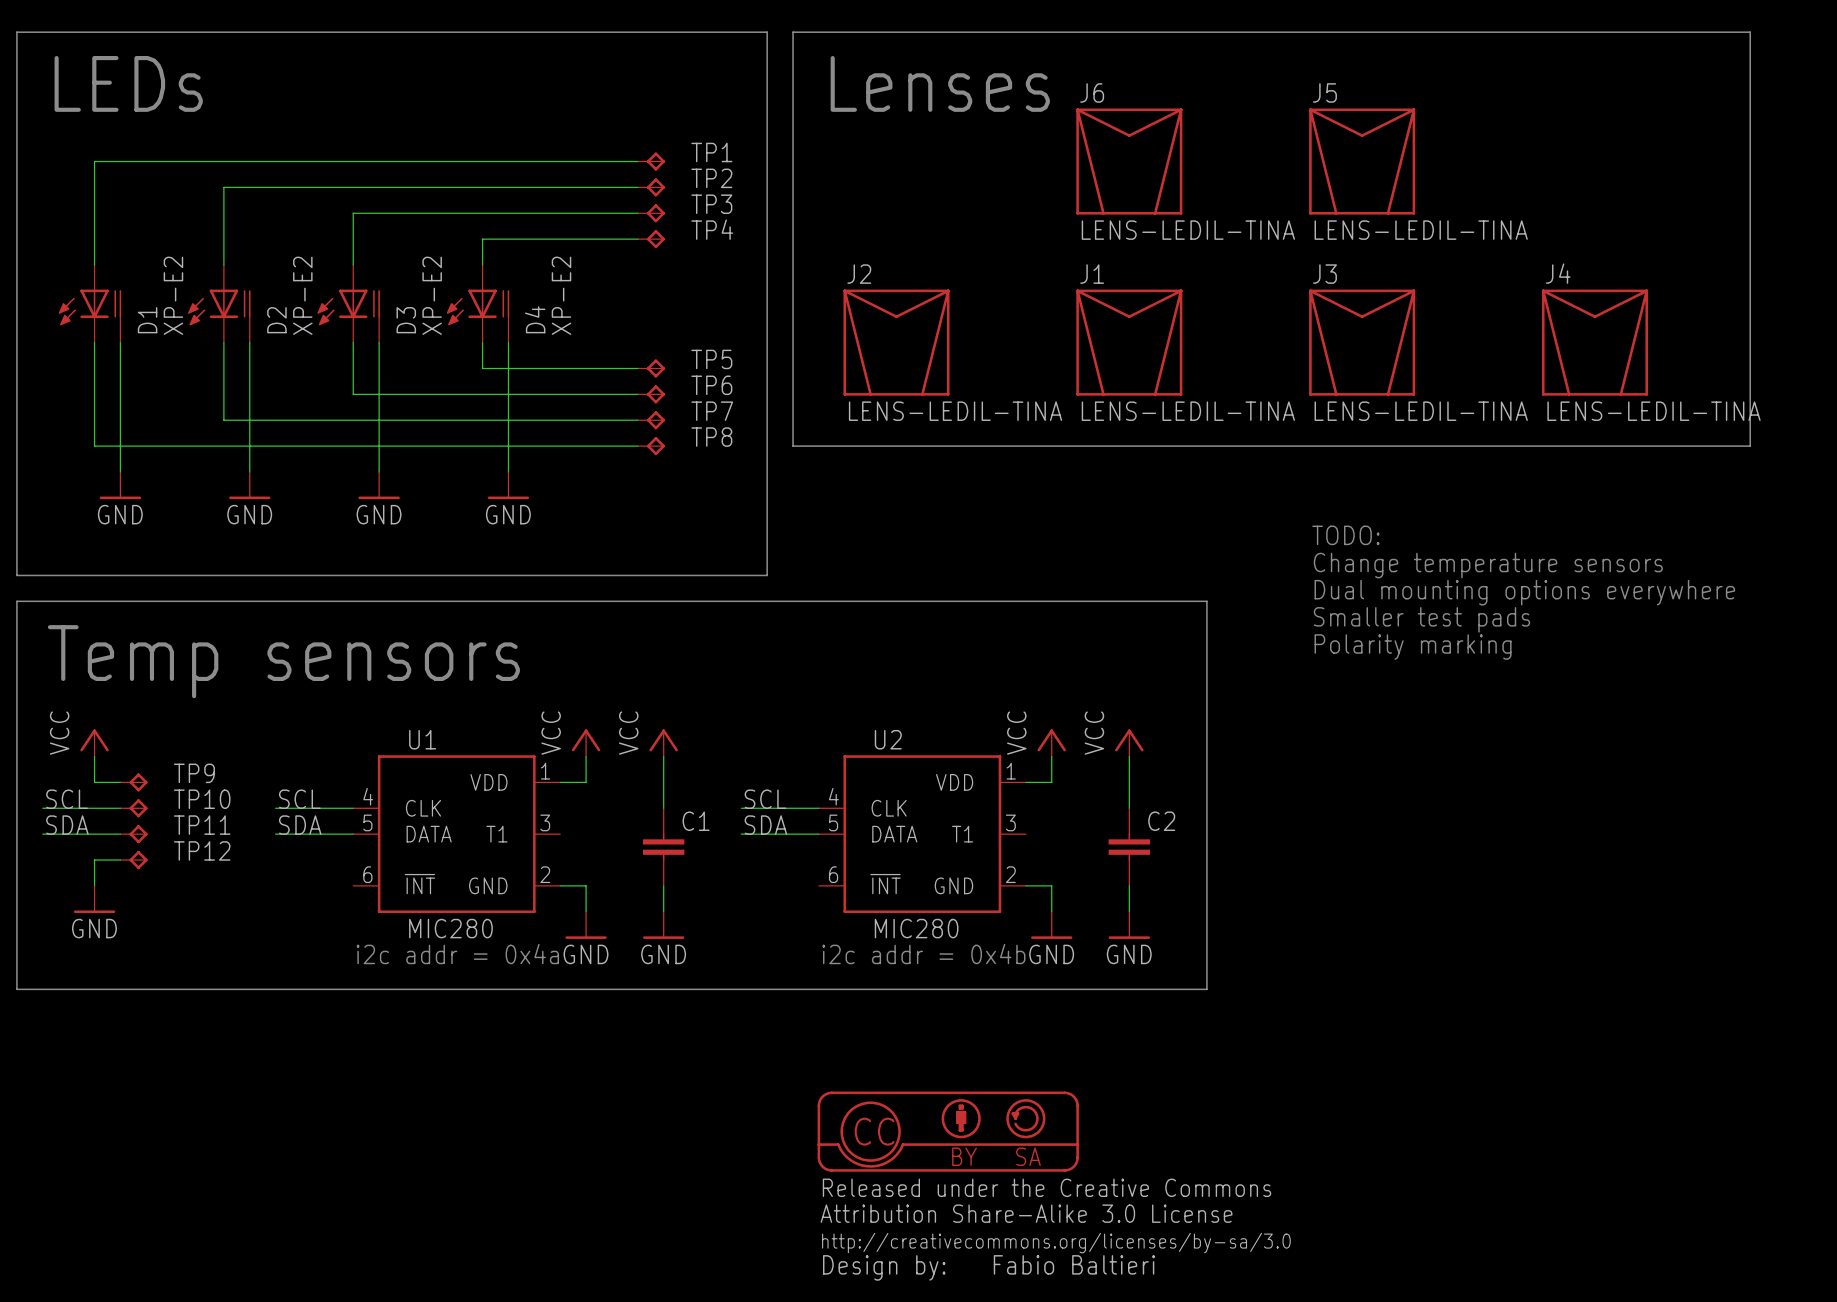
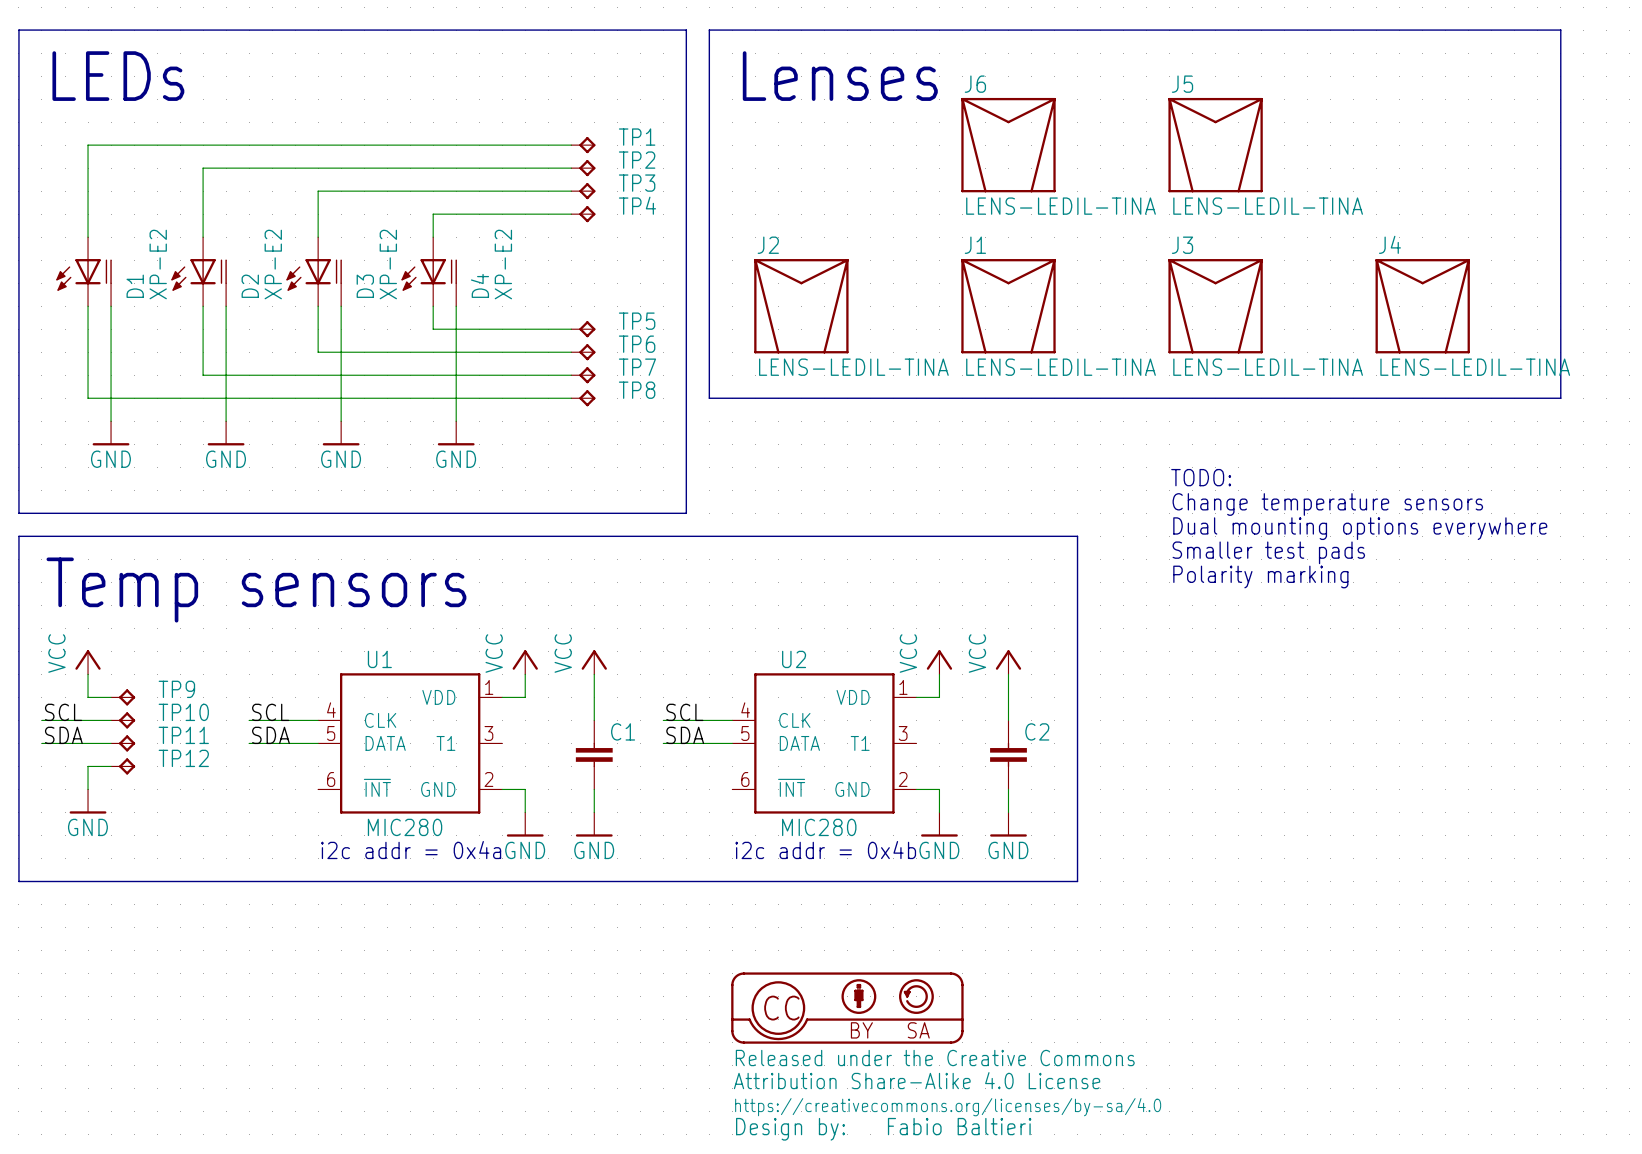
part text: Attribution Share-Alike 3.0 License (1026, 1213) -> Attribution Share-Alike 4.0 License (917, 1080)
part text: http://creativecommons.org/licenses/by-sa/3.0 (1056, 1243) -> https://creativecommons.org/licenses/by-sa/4.0 (948, 1107)

